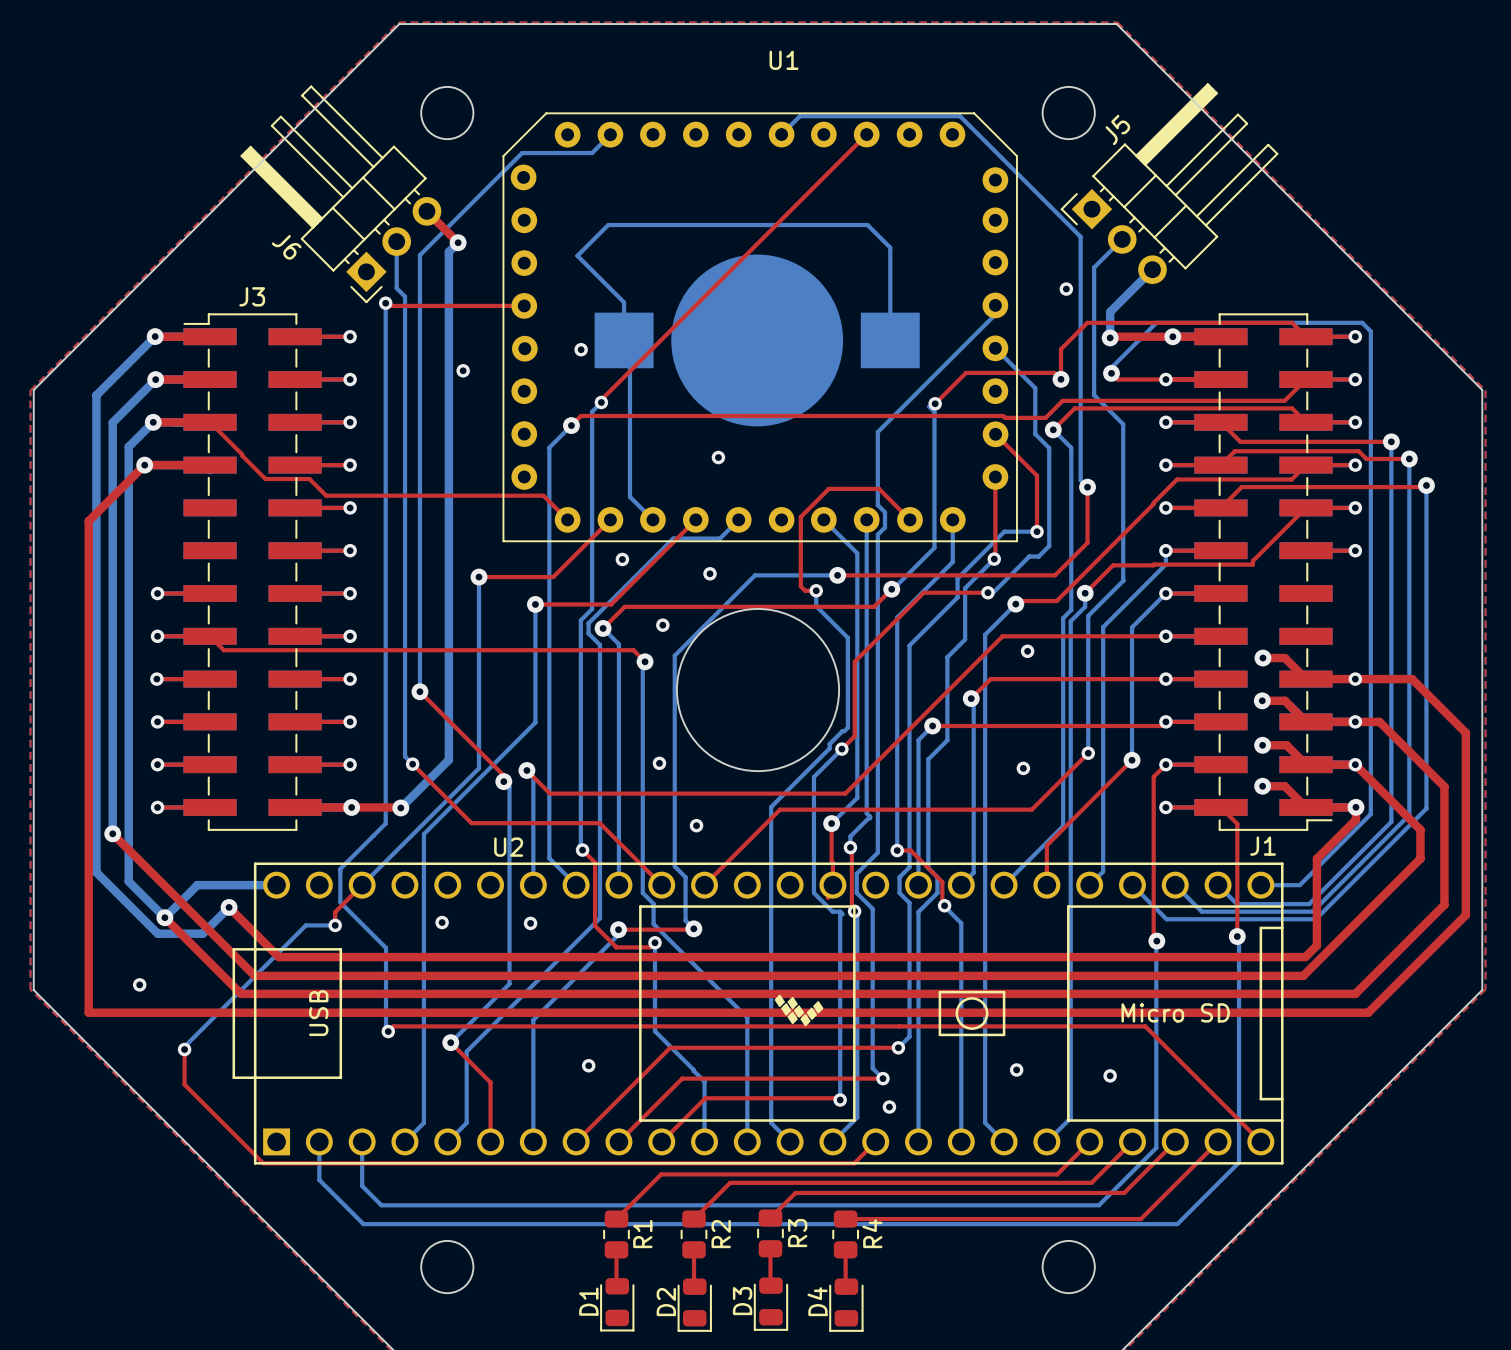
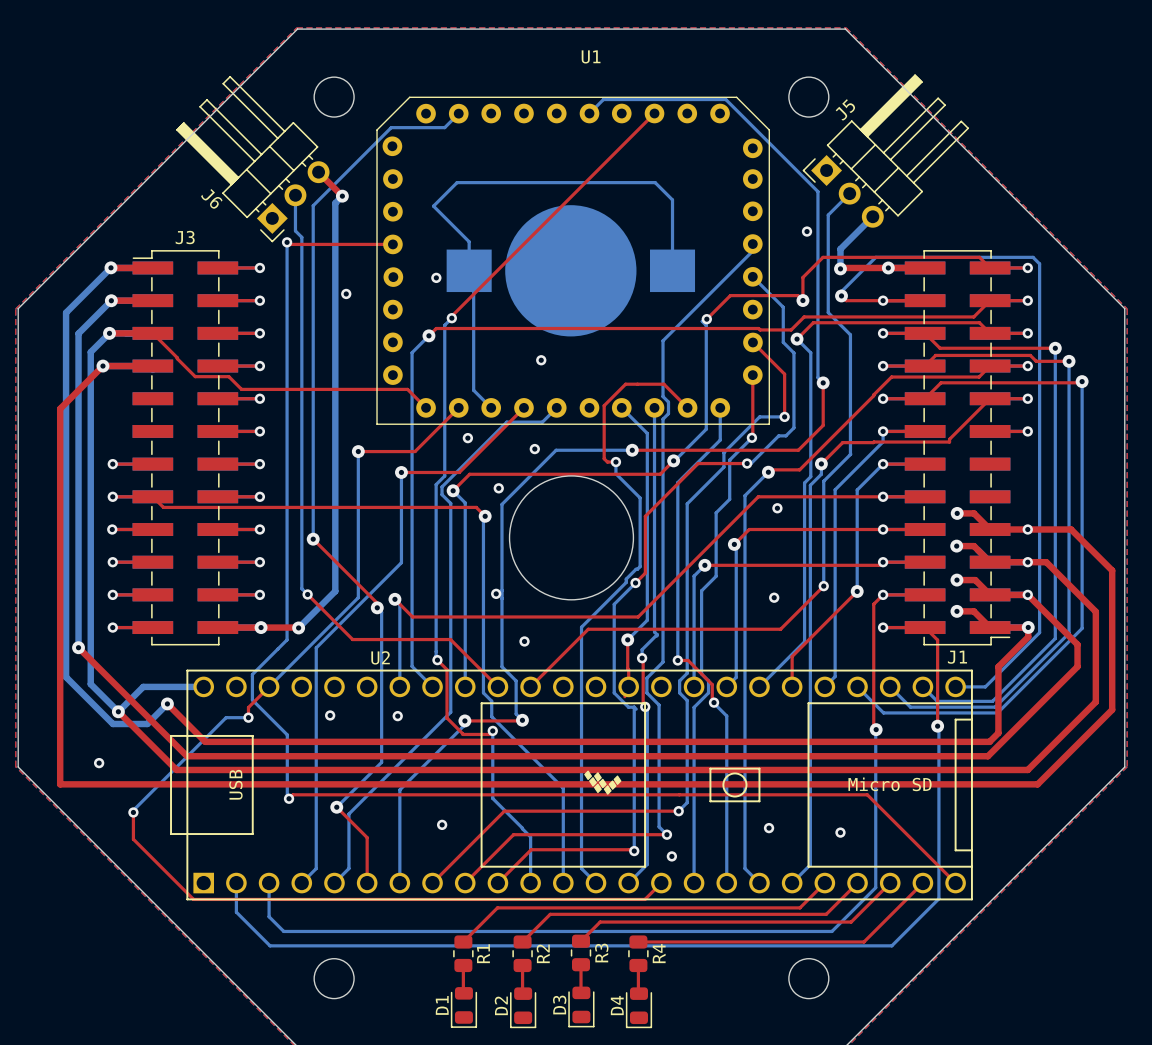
bottom track: (755, 575) (674, 655) (674, 866) -> (569, 450) (556, 450) (501, 504) (501, 590)
bottom track: none -> (502, 590) (502, 598)
bottom track: none -> (501, 598) (501, 666) (507, 672)

